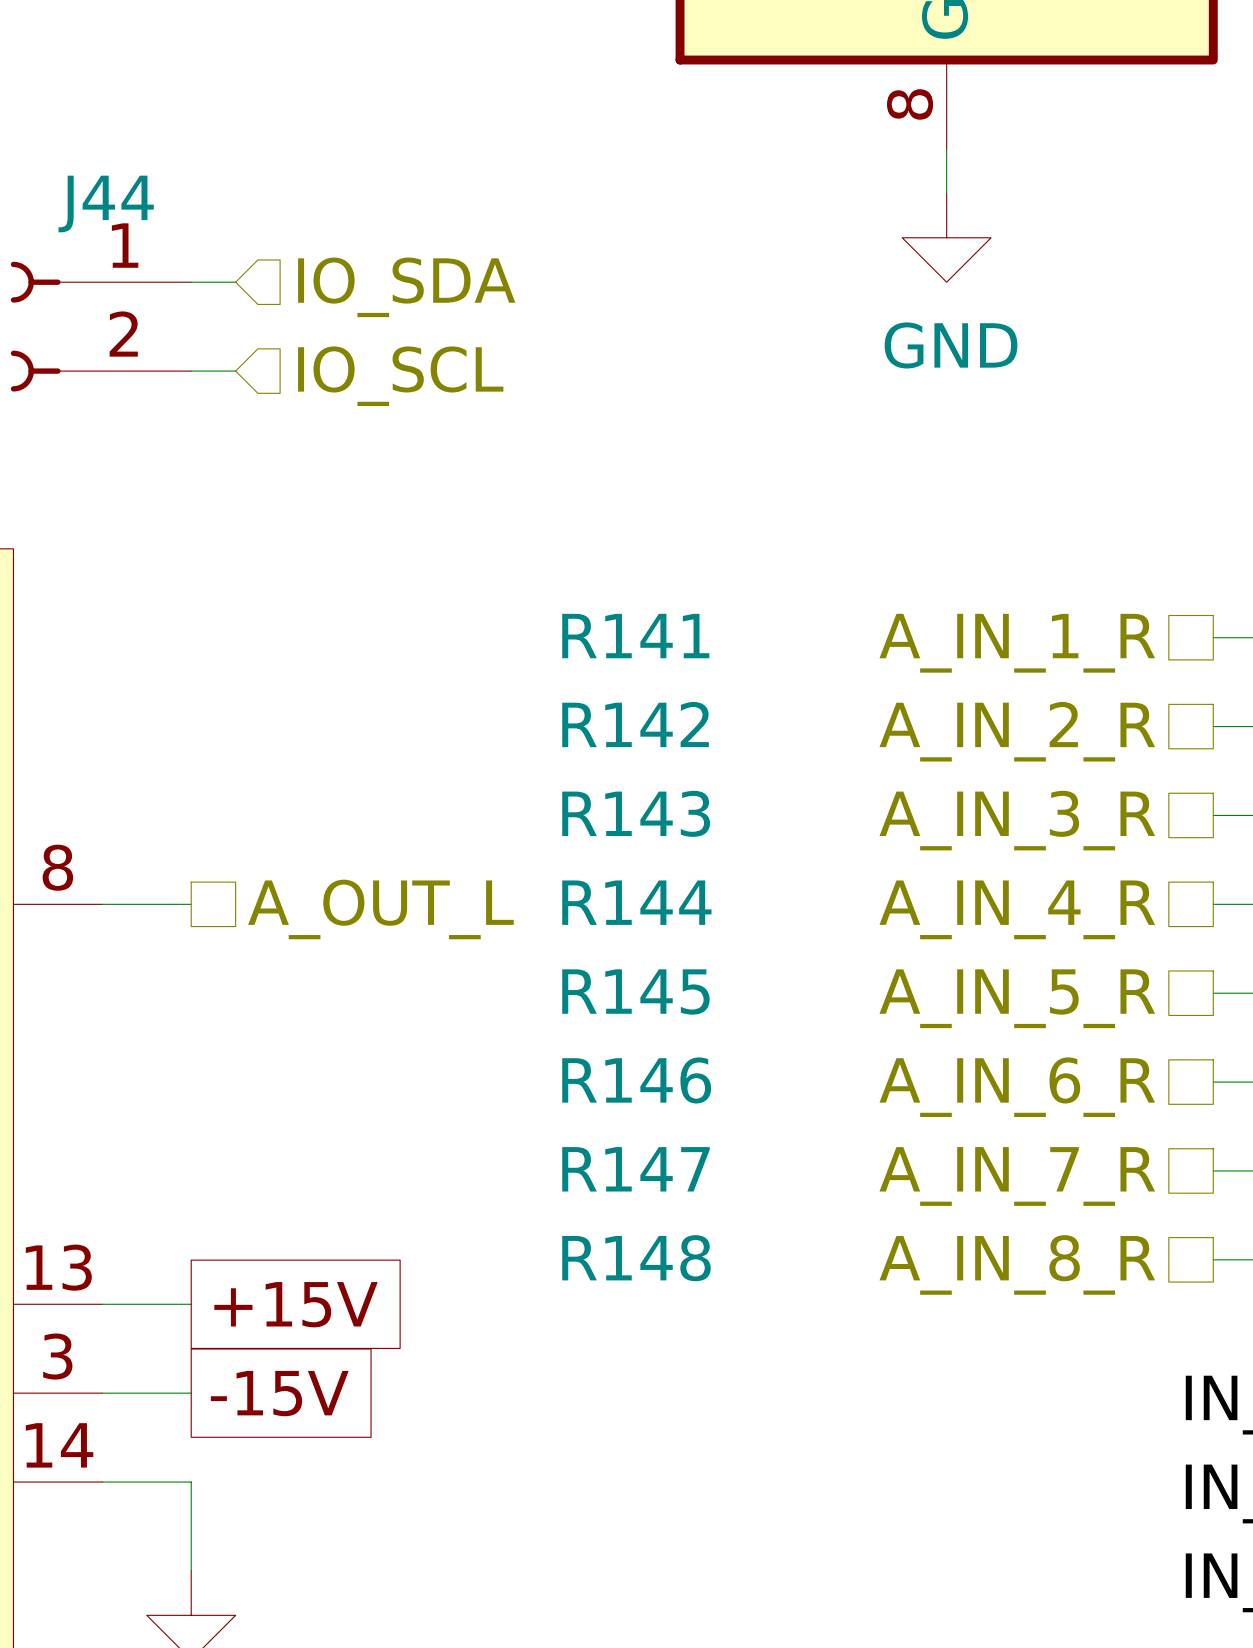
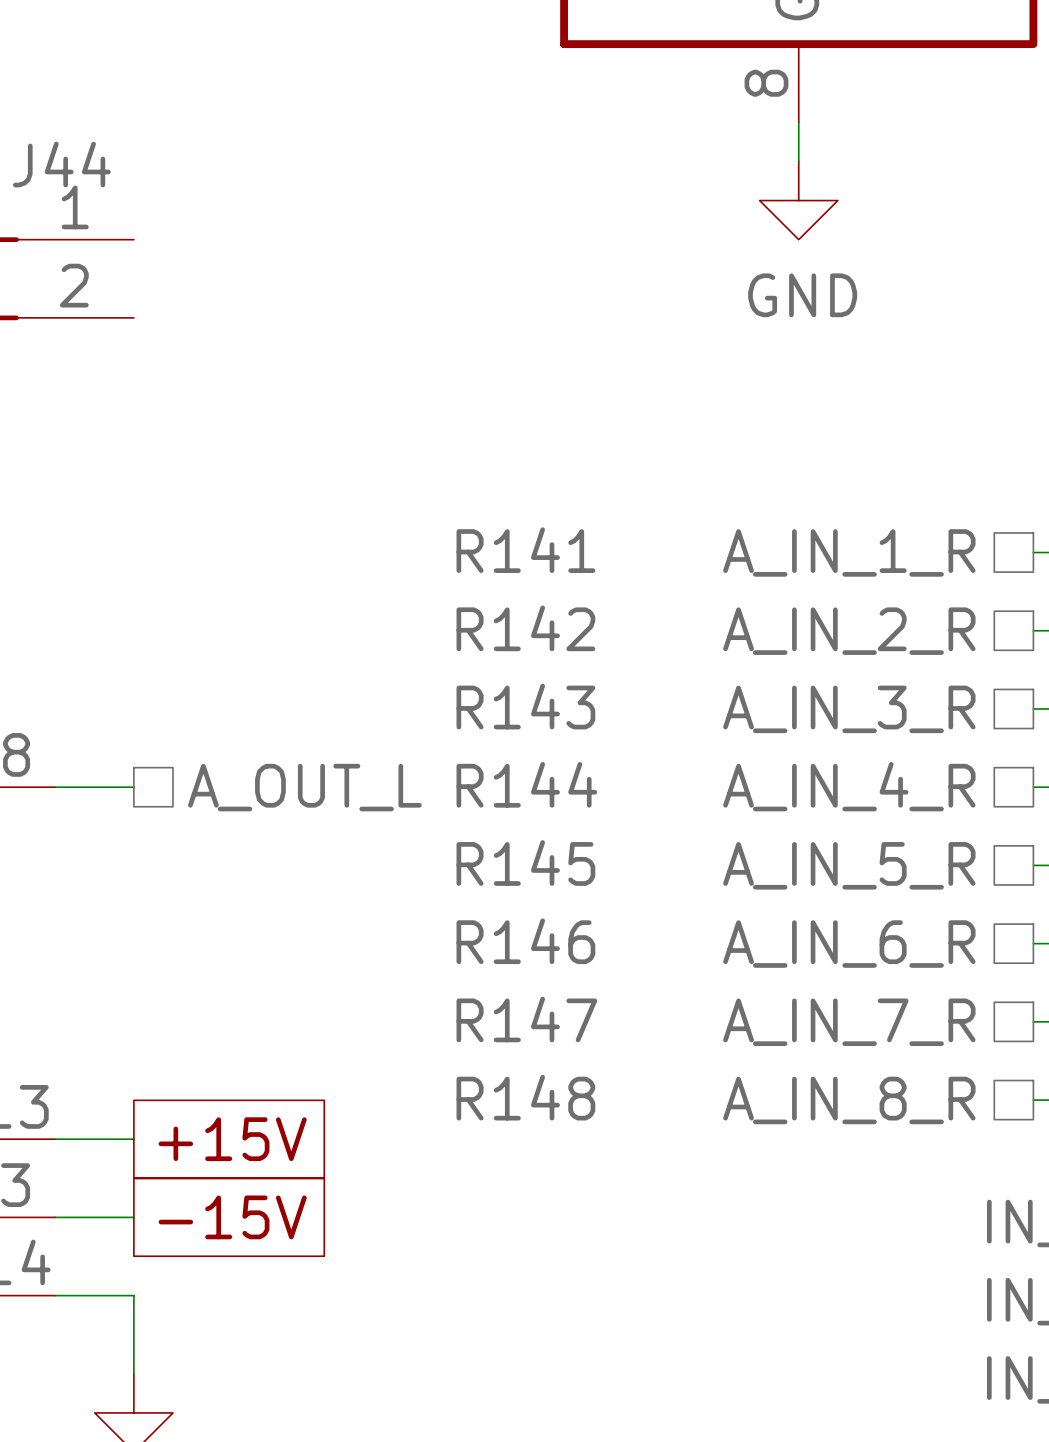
wire: (191, 282) (235, 282) -> none
hierarchical label: IO_SDA (406, 287) -> none
wire: (191, 371) (235, 371) -> none
hierarchical label: IO_SCL (400, 376) -> none

